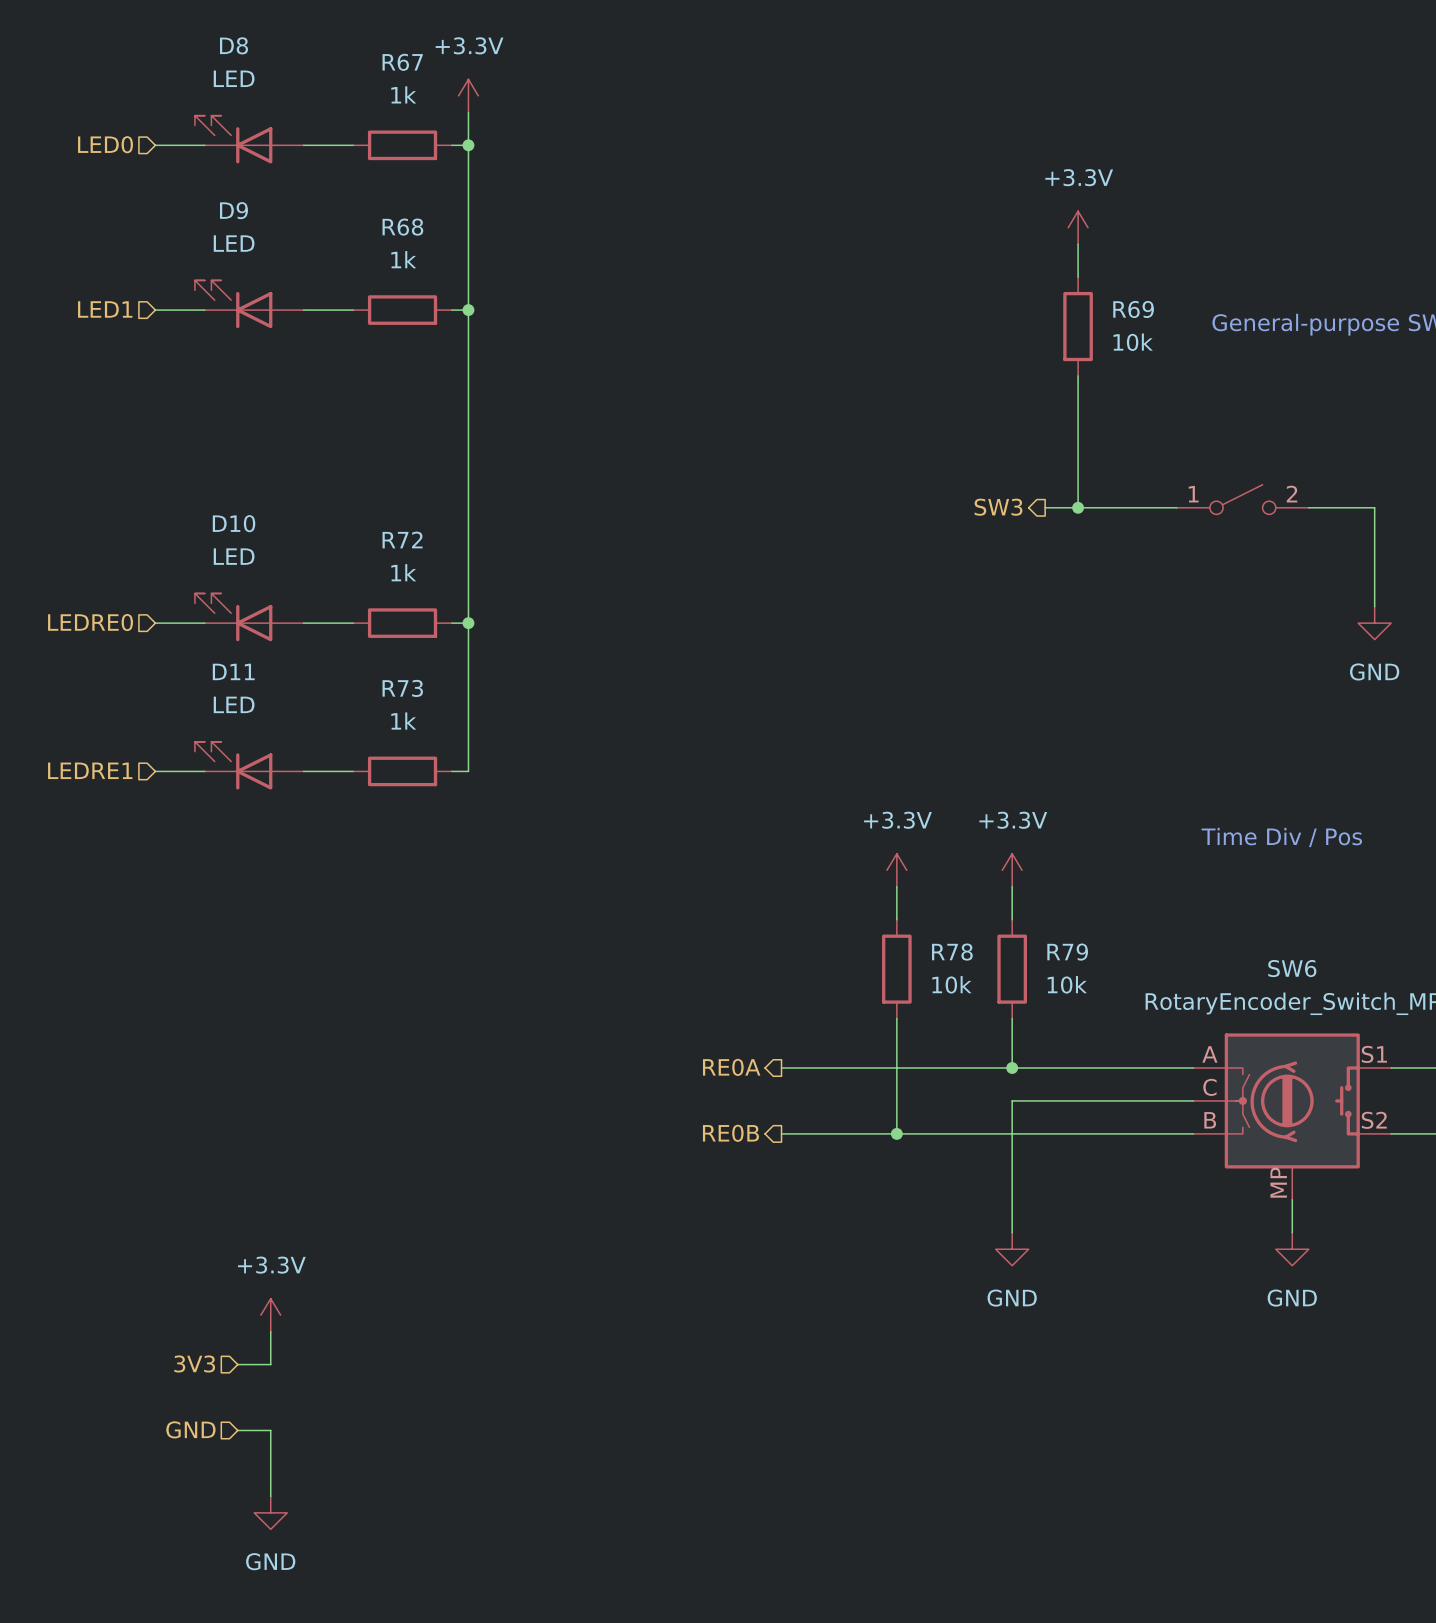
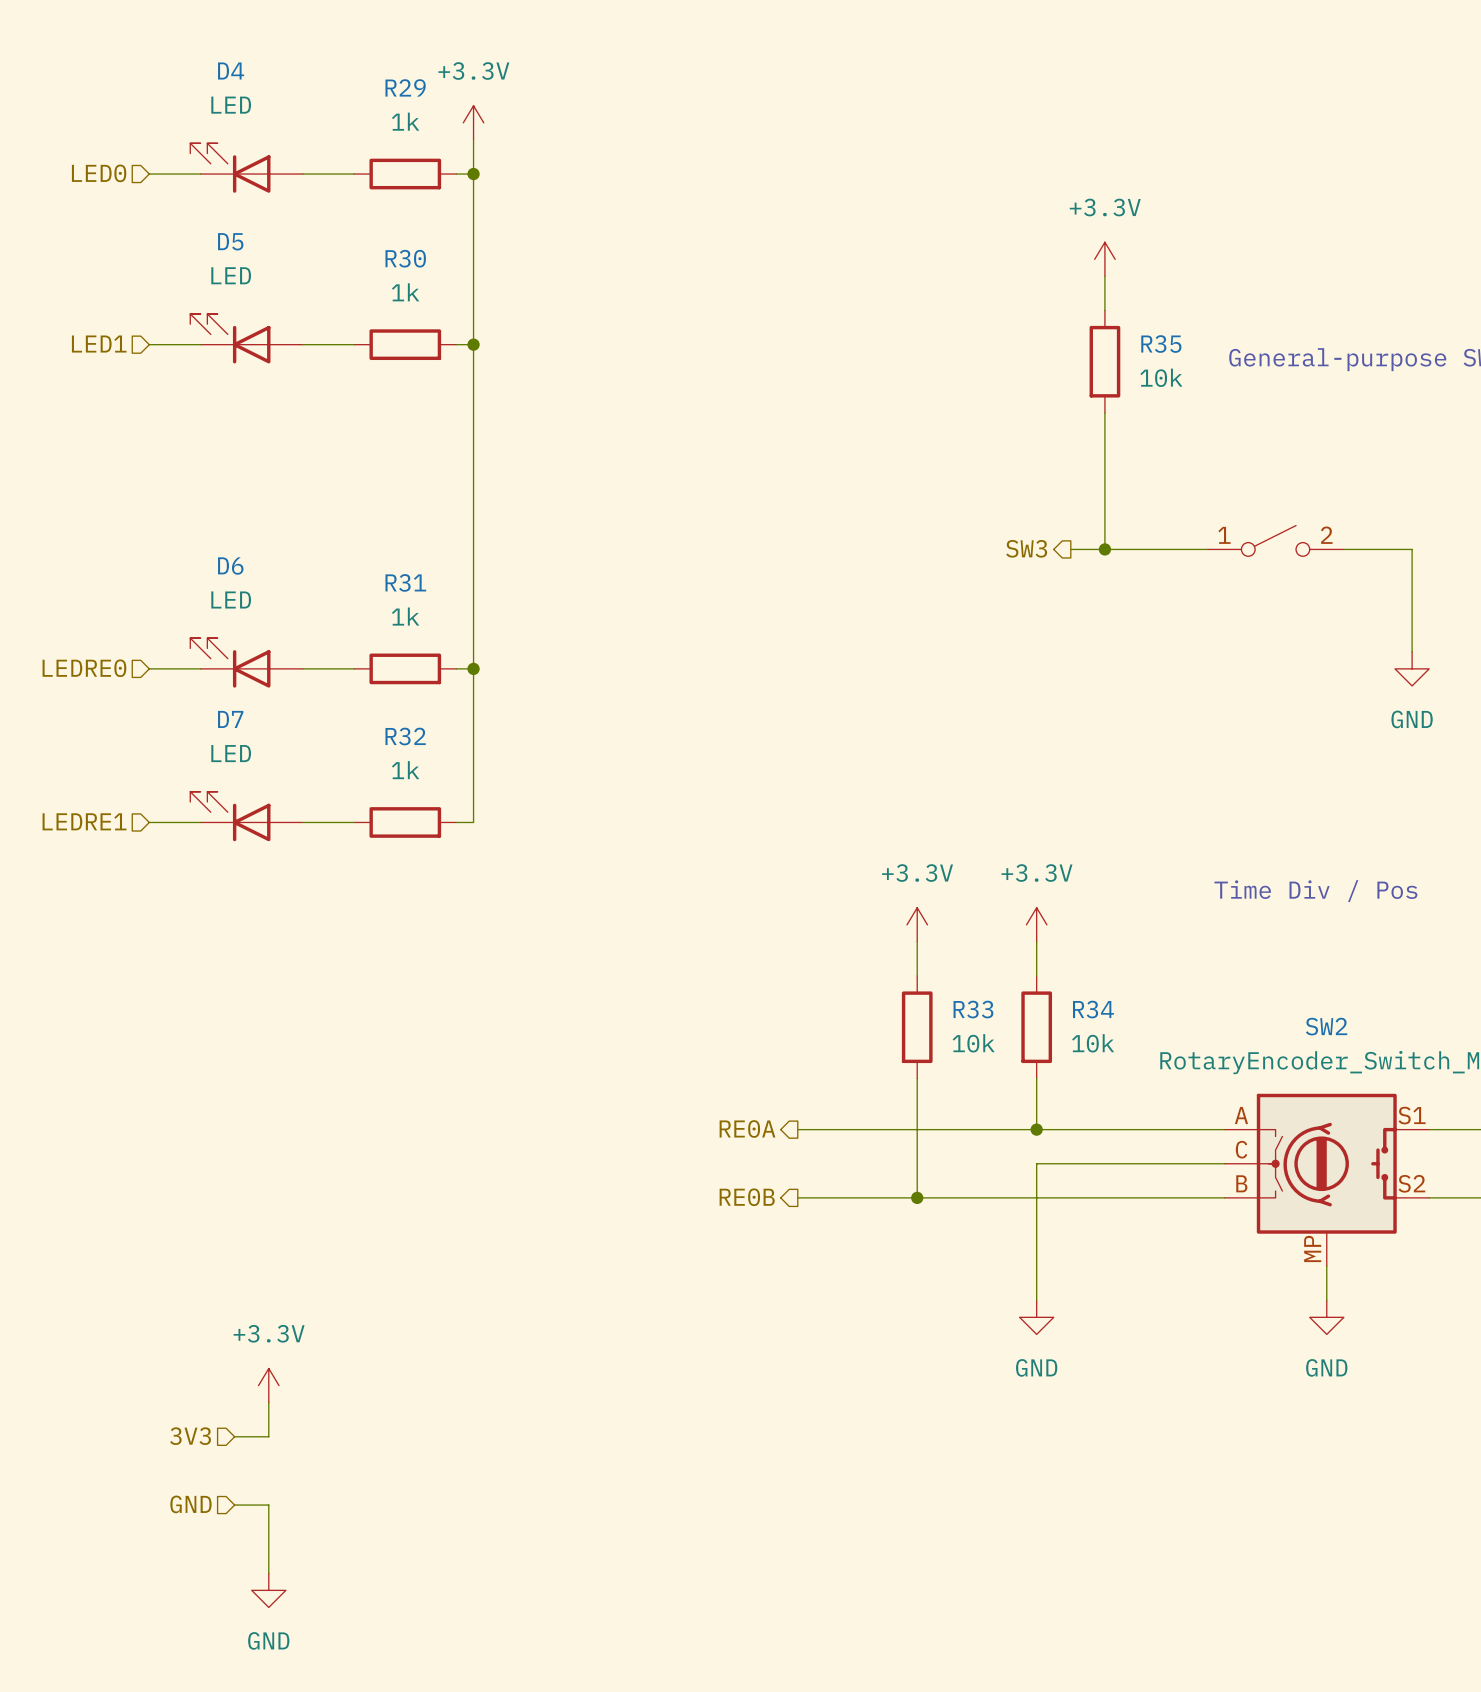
D8 name: D8 (234, 45) -> D4 (231, 70)
R67 name: R67 (402, 62) -> R29 (405, 87)
D9 name: D9 (233, 210) -> D5 (230, 241)
R68 name: R68 (402, 227) -> R30 (405, 258)
R69 name: R69 (1133, 309) -> R35 (1161, 344)
D10 name: D10 (234, 523) -> D6 (230, 566)
R72 name: R72 (402, 539) -> R31 (405, 582)
D11 name: D11 (233, 671) -> D7 (230, 719)
R73 name: R73 (402, 688) -> R32 (405, 736)
R78 name: R78 (952, 952) -> R33 (973, 1009)
R79 name: R79 (1067, 952) -> R34 (1093, 1009)
SW6 name: SW6 (1292, 968) -> SW2 (1326, 1026)

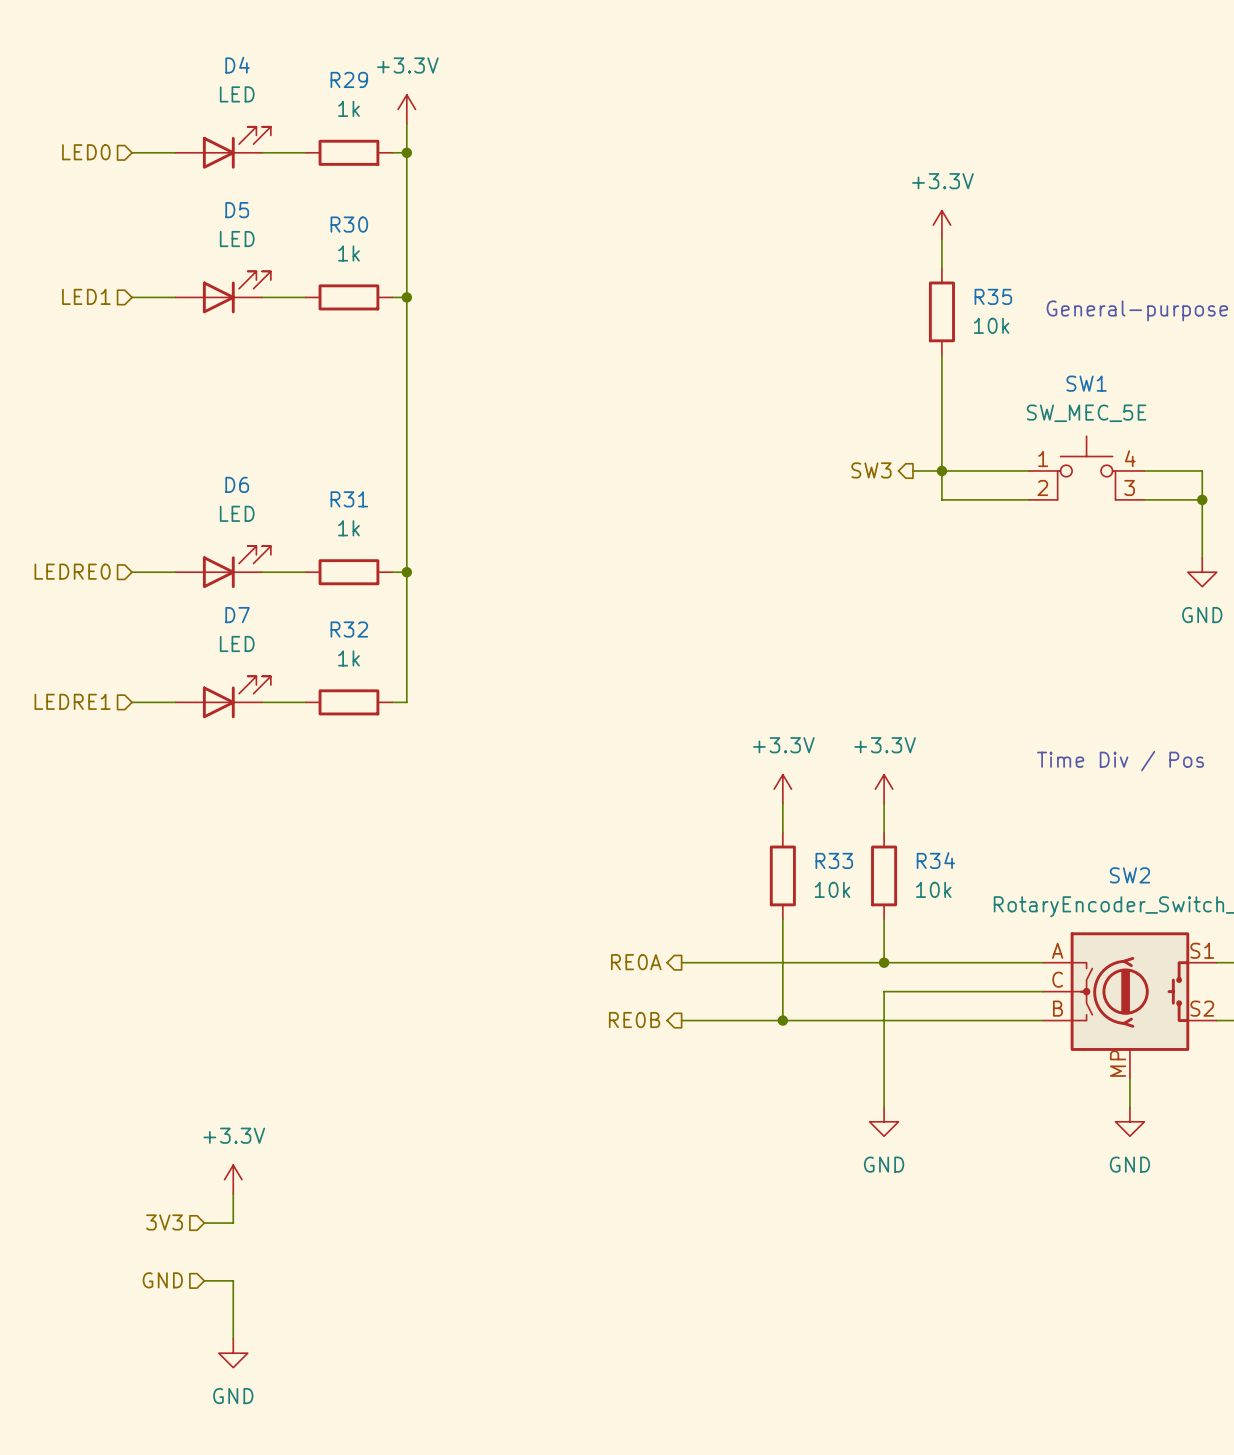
D4 flip: as is (230, 168) -> left-right (236, 147)
D5 flip: as is (230, 338) -> left-right (236, 292)
part: (1275, 540) -> none
SW1: none -> SW_MEC_5E (1086, 468)
wire: none -> (941, 470) (941, 499) (1028, 499)
wire: none -> (1144, 499) (1202, 499)
junction: none -> (1202, 499)
D6 flip: as is (230, 662) -> left-right (236, 567)
D7 flip: as is (230, 816) -> left-right (236, 697)

